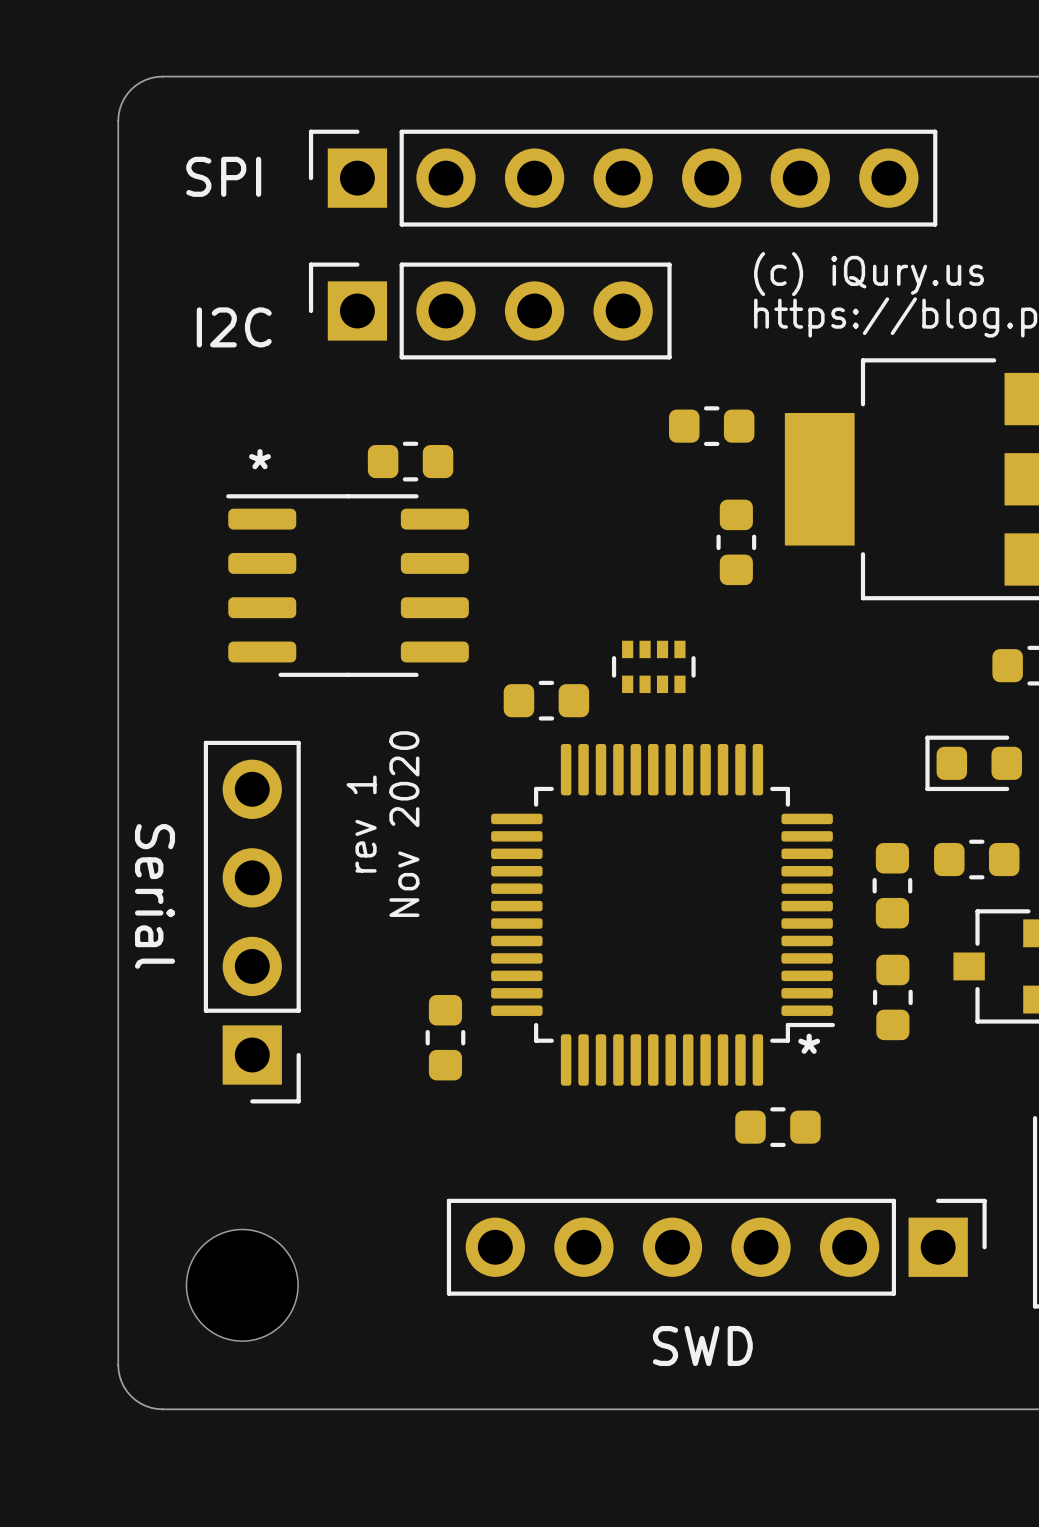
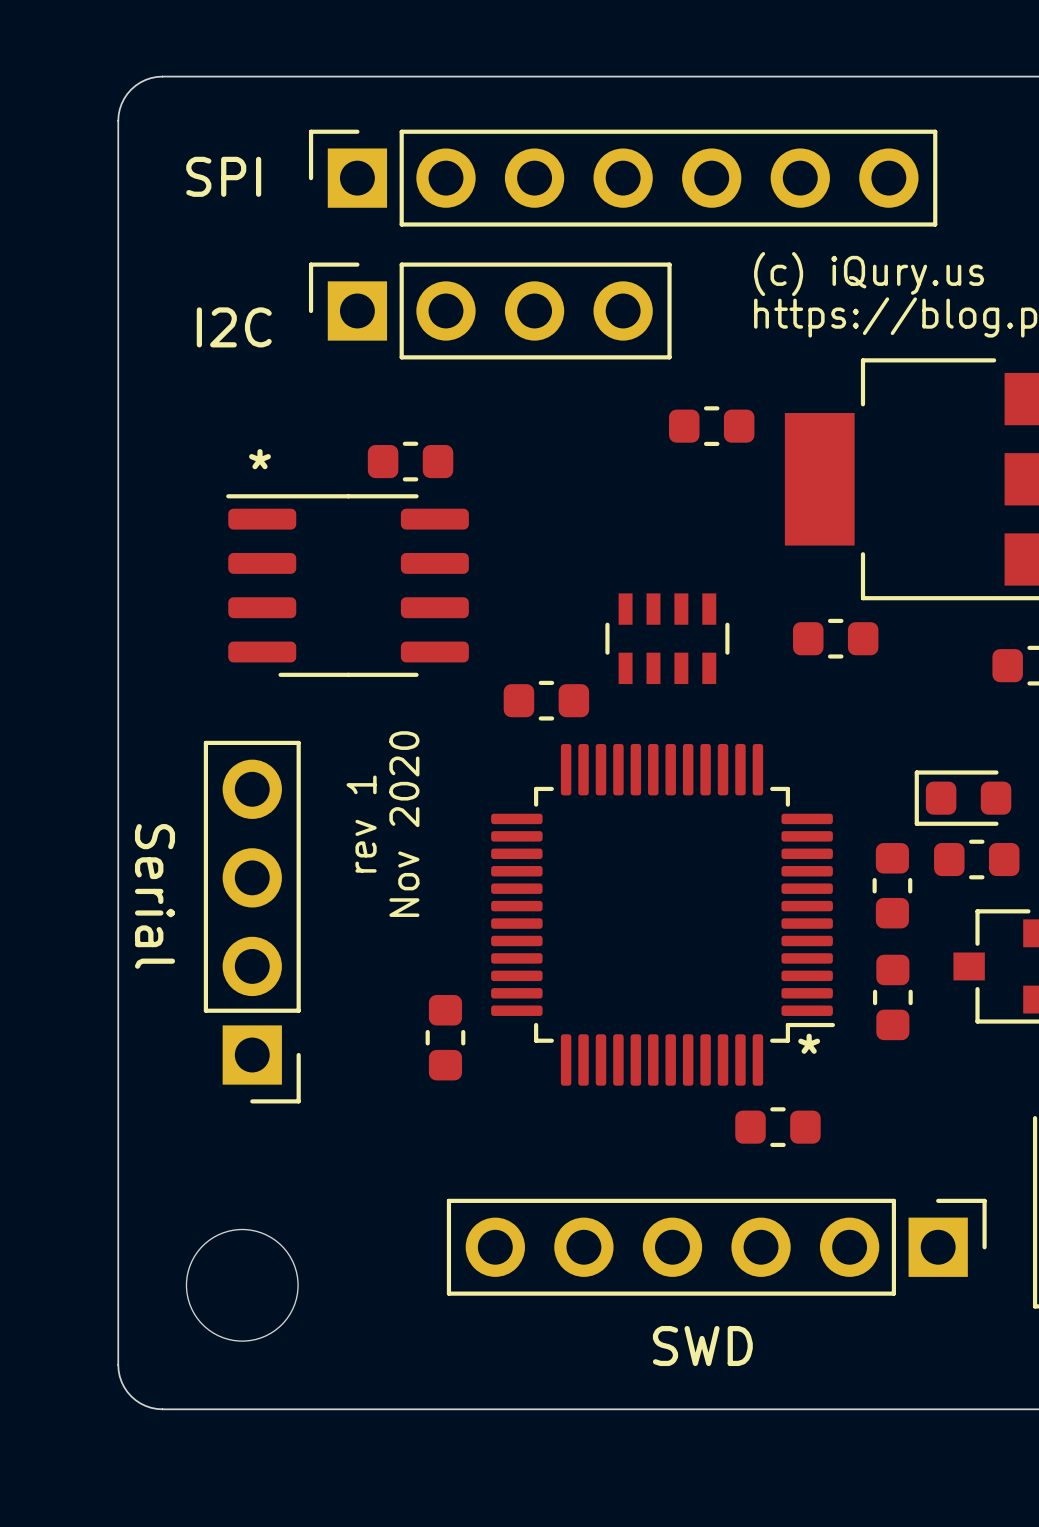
part rotation: 0° (736, 542) -> 90° clockwise (835, 638)
part position: (736, 542) -> (835, 638)
part footprint: [611, 640, 696, 694] -> [605, 593, 730, 685]
part position: (973, 763) -> (963, 798)

